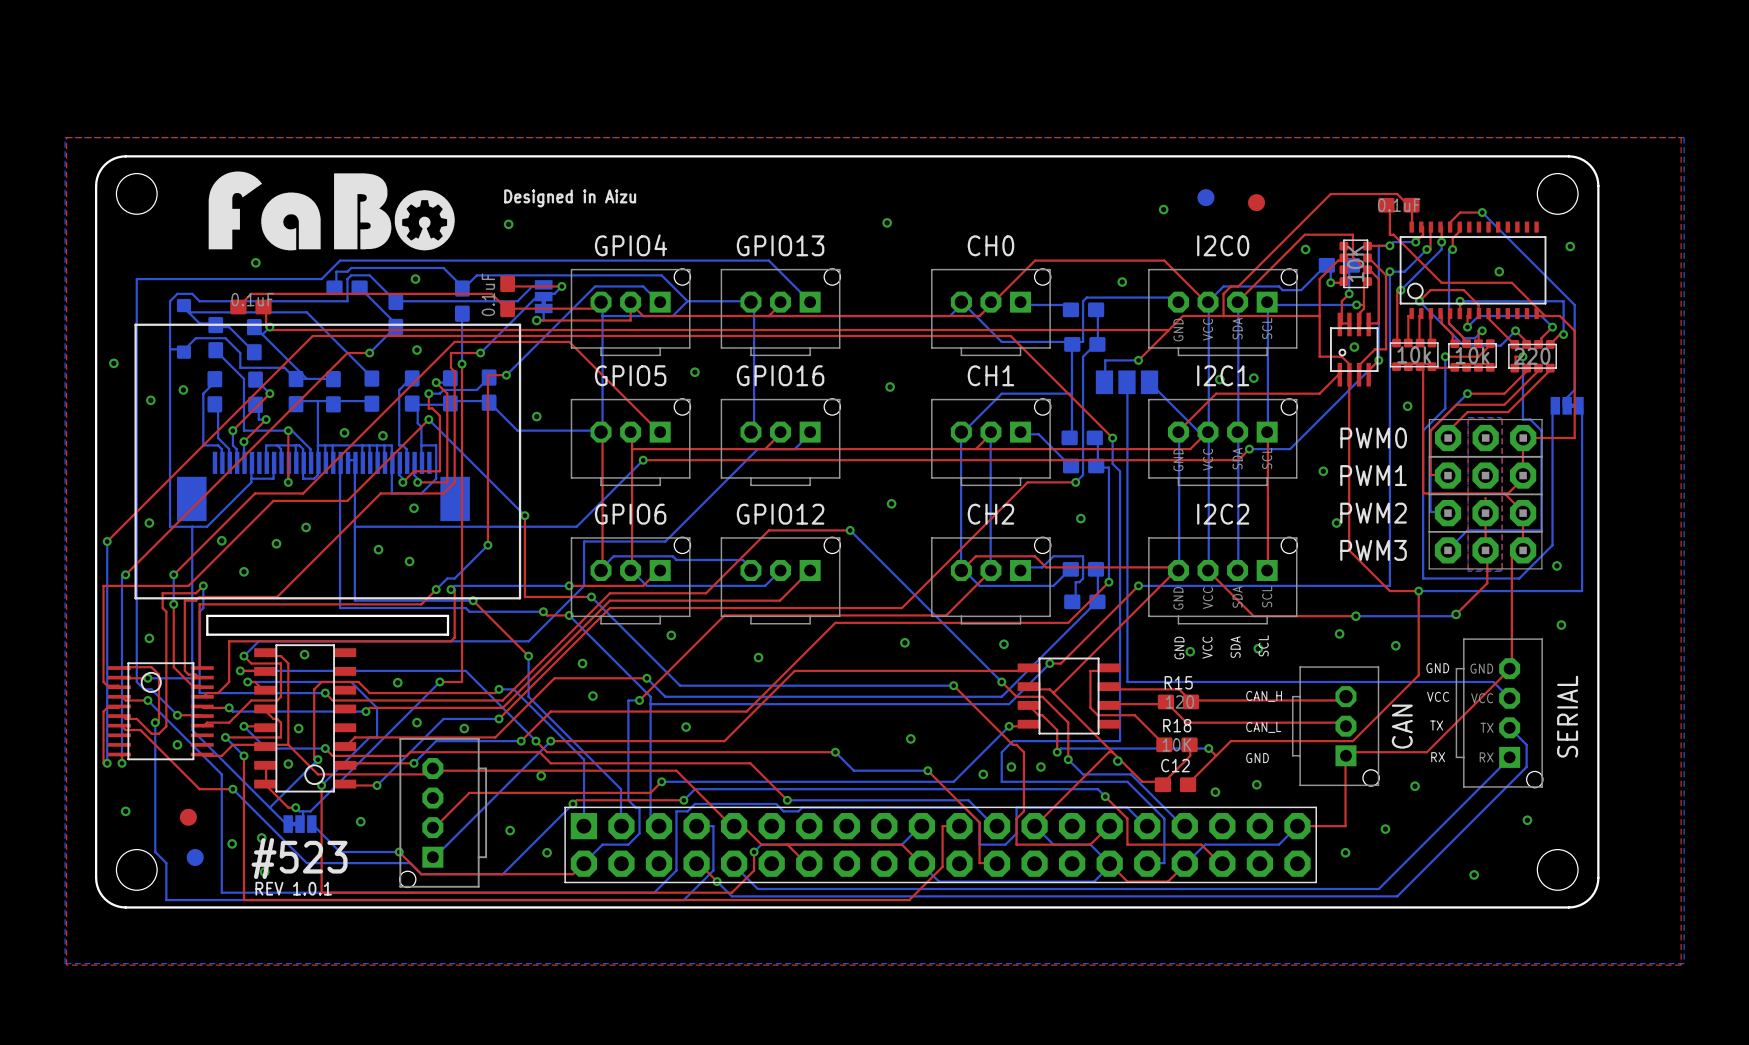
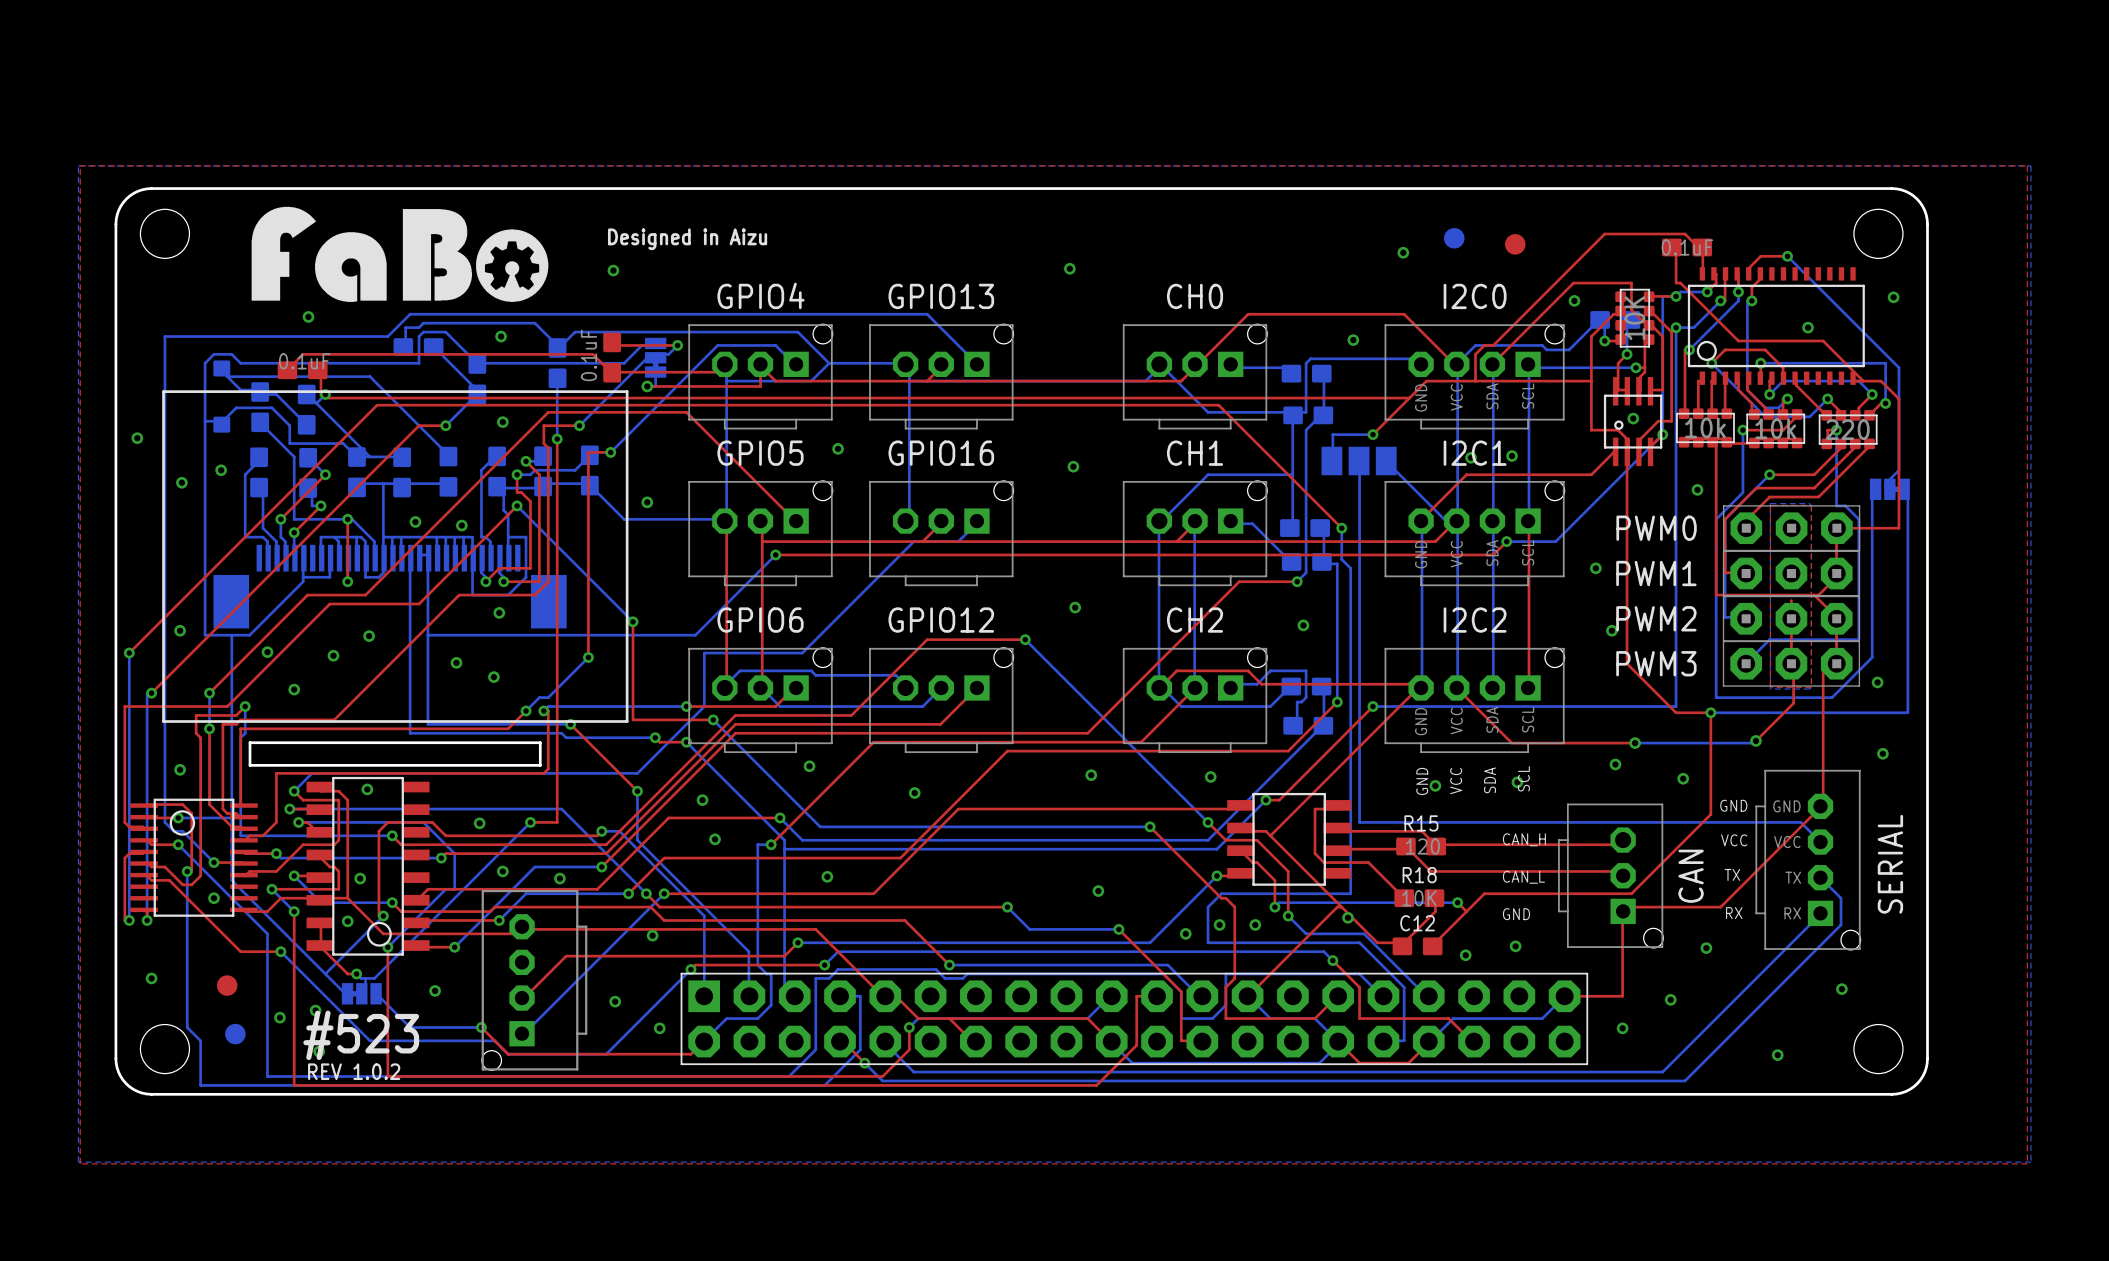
text: REV 1.0.1 (293, 888) -> REV 1.0.2 (354, 1071)

